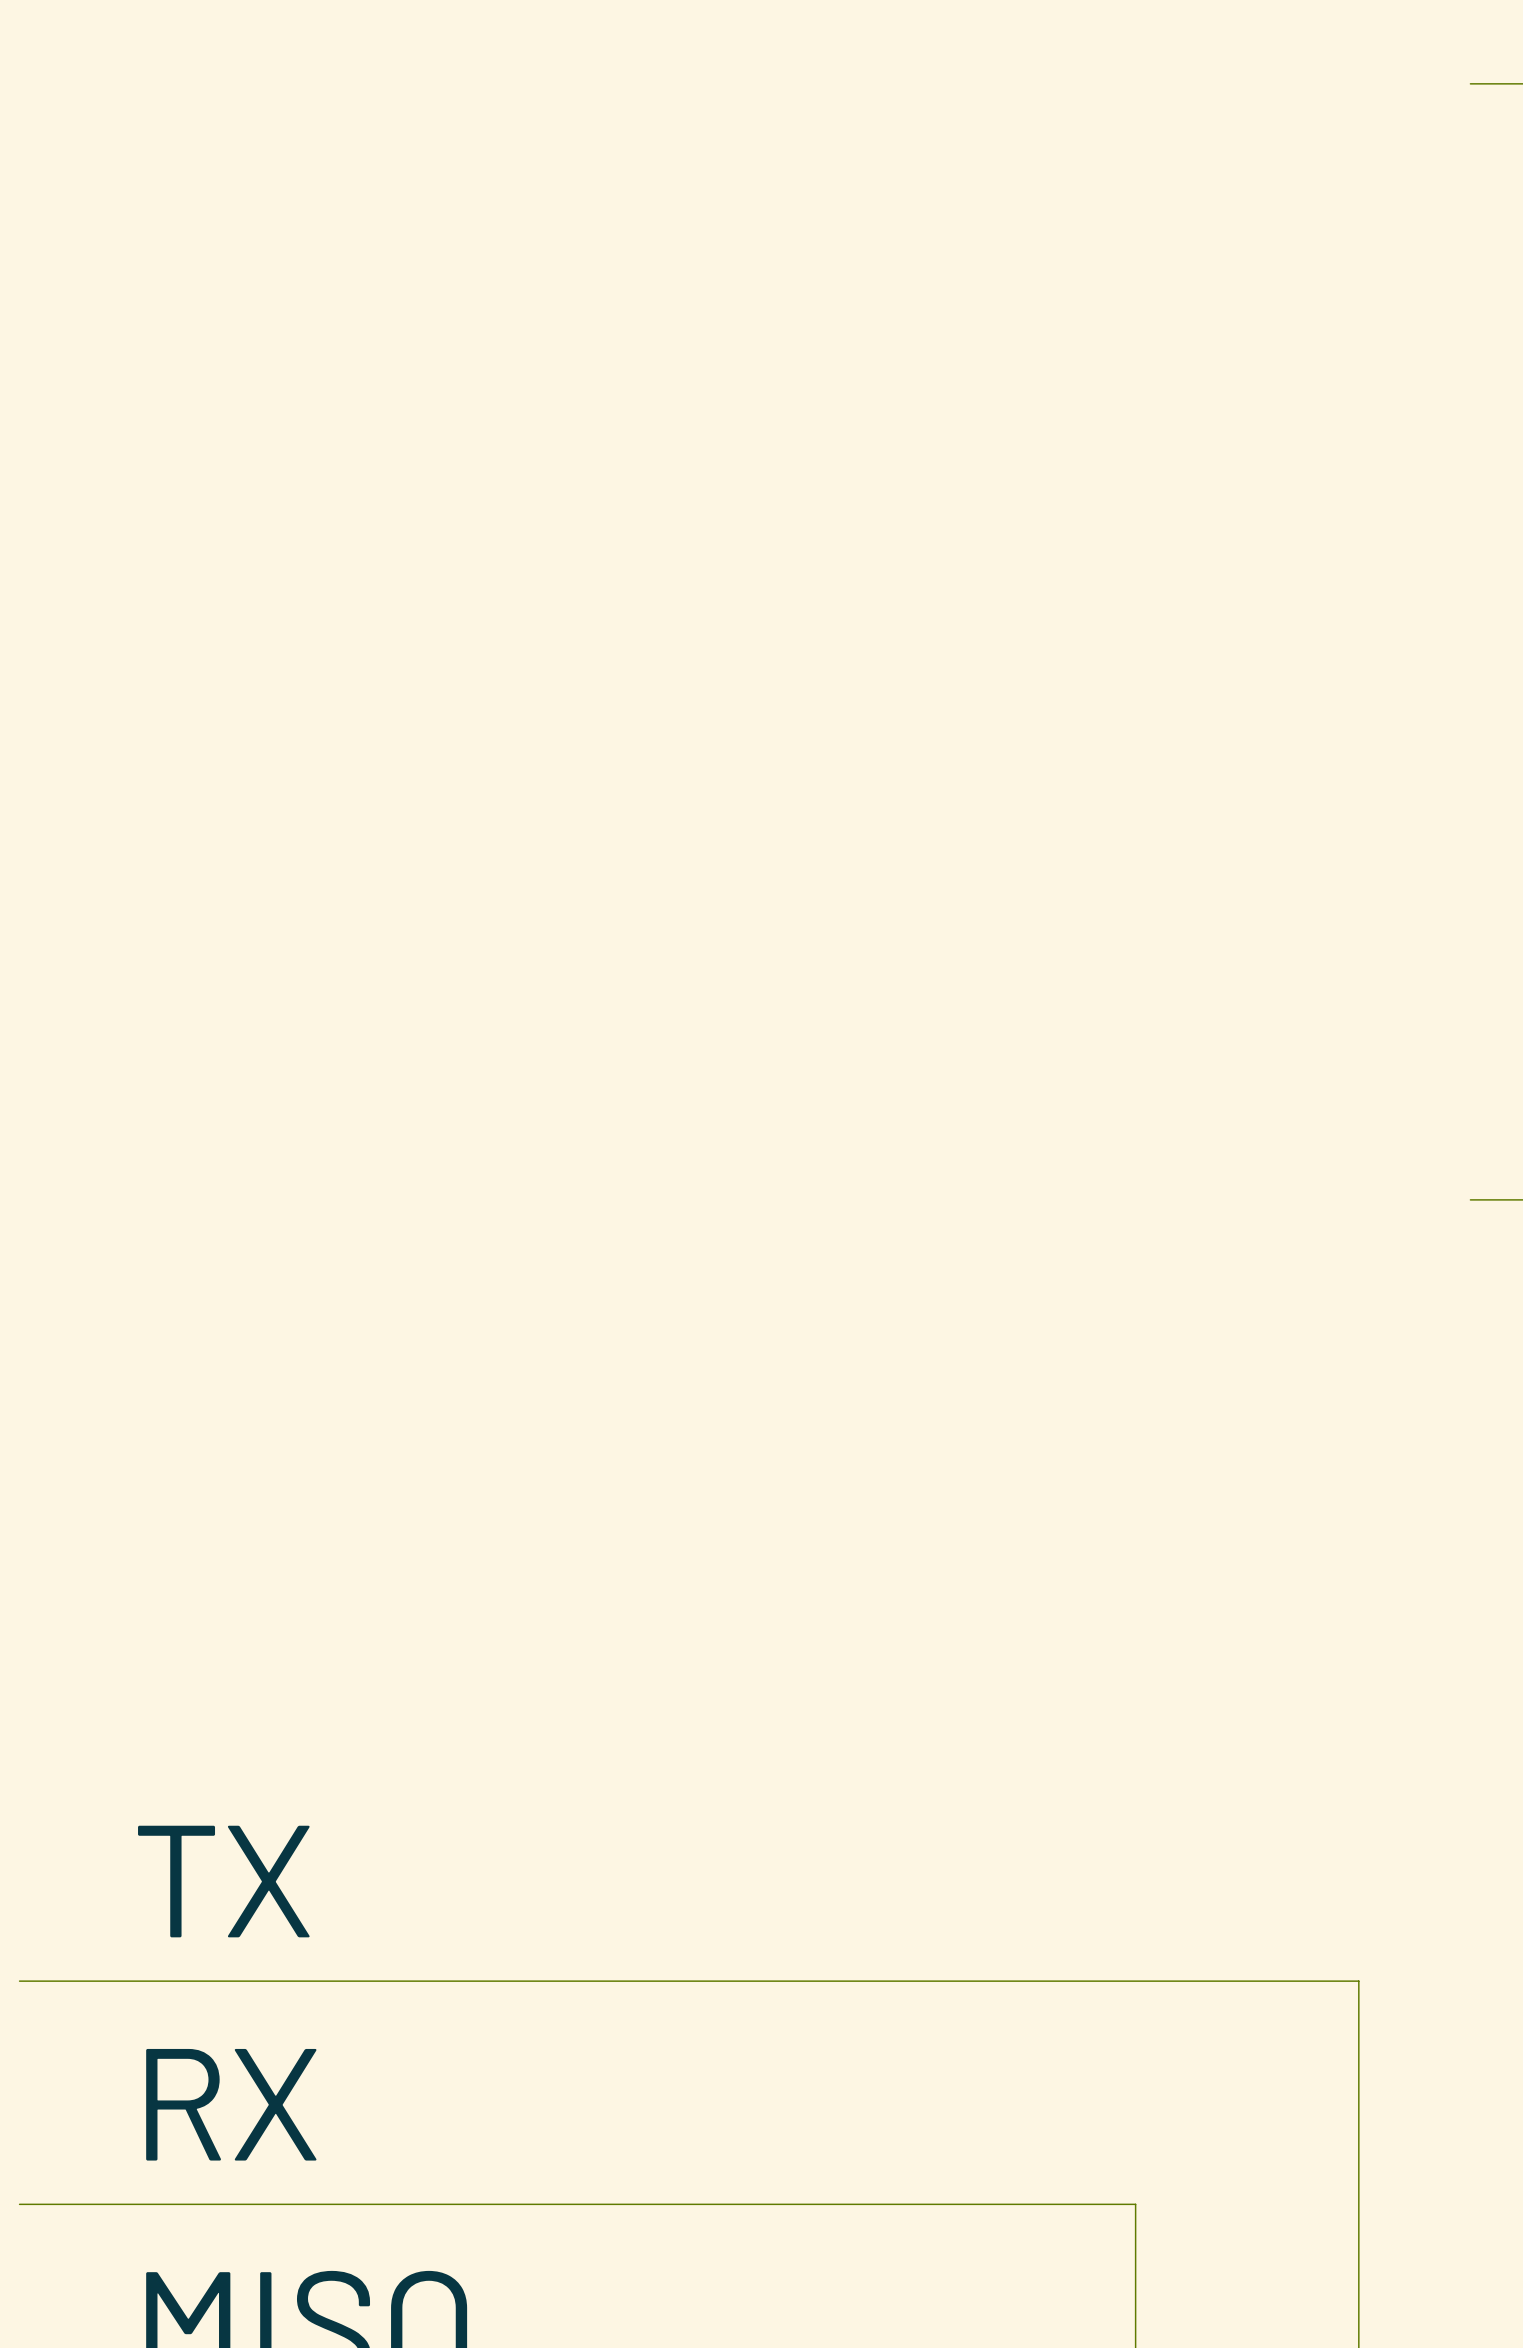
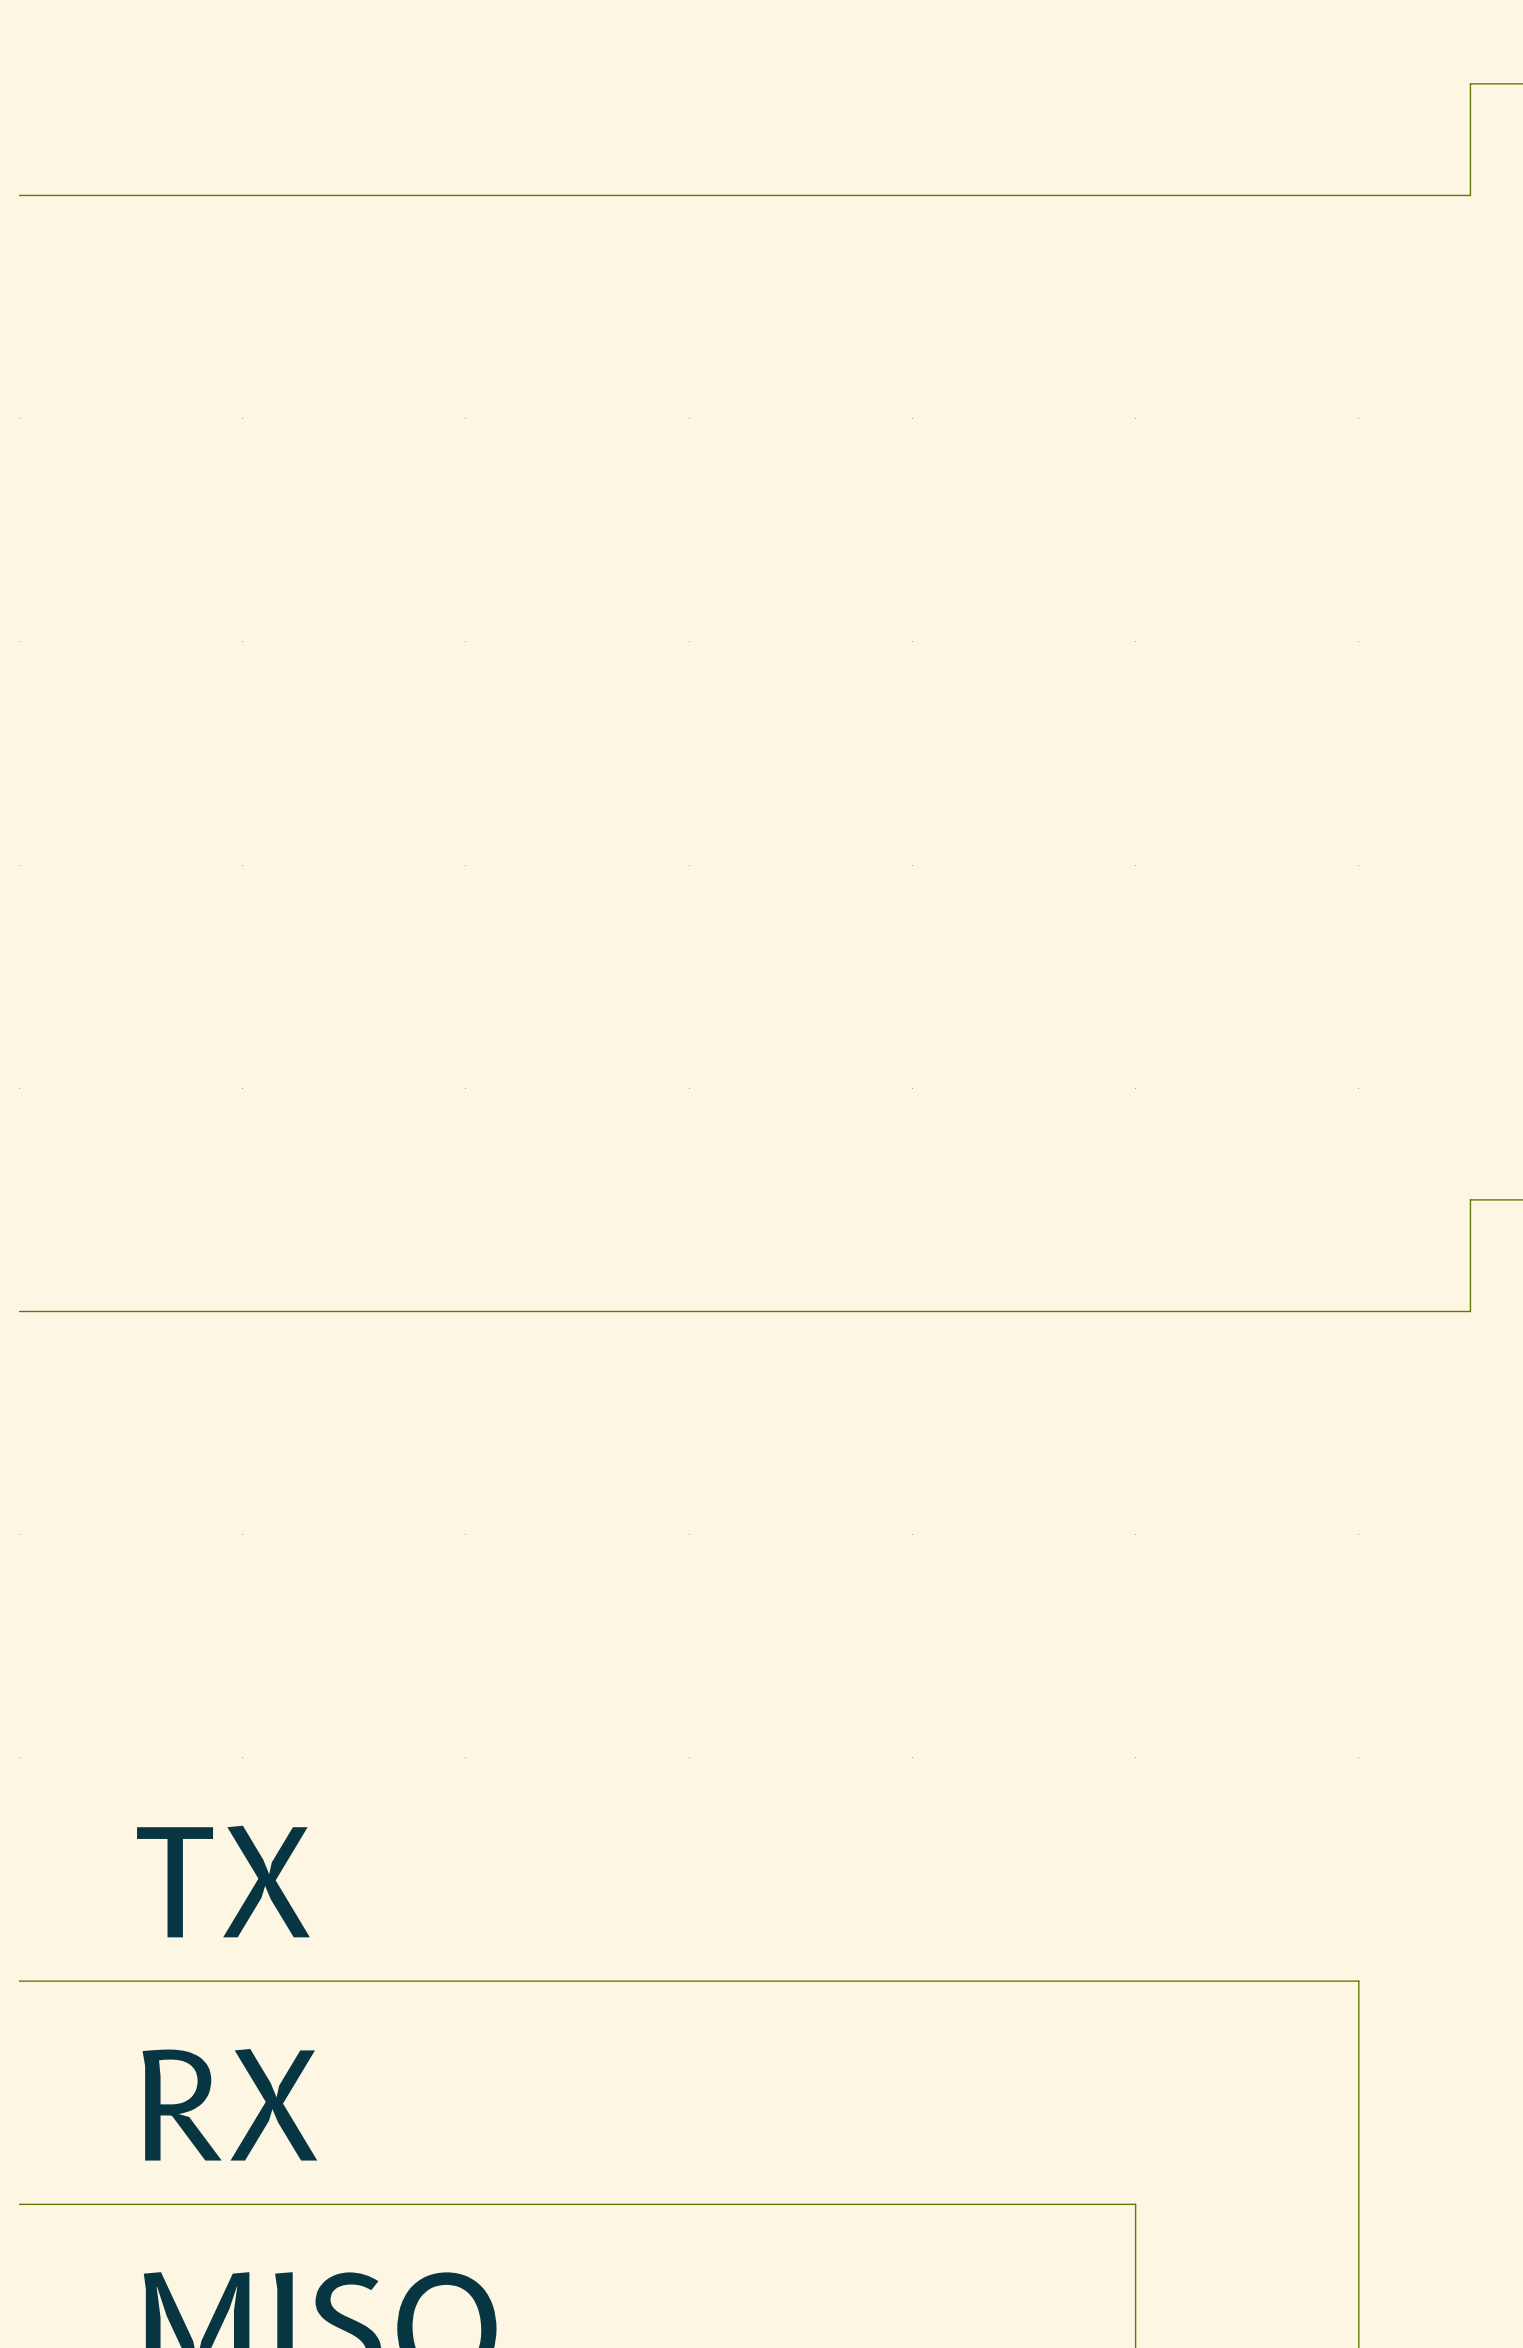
wire: none -> (1470, 83) (1470, 195) (19, 195)
wire: none -> (1470, 1199) (1470, 1311) (19, 1311)

